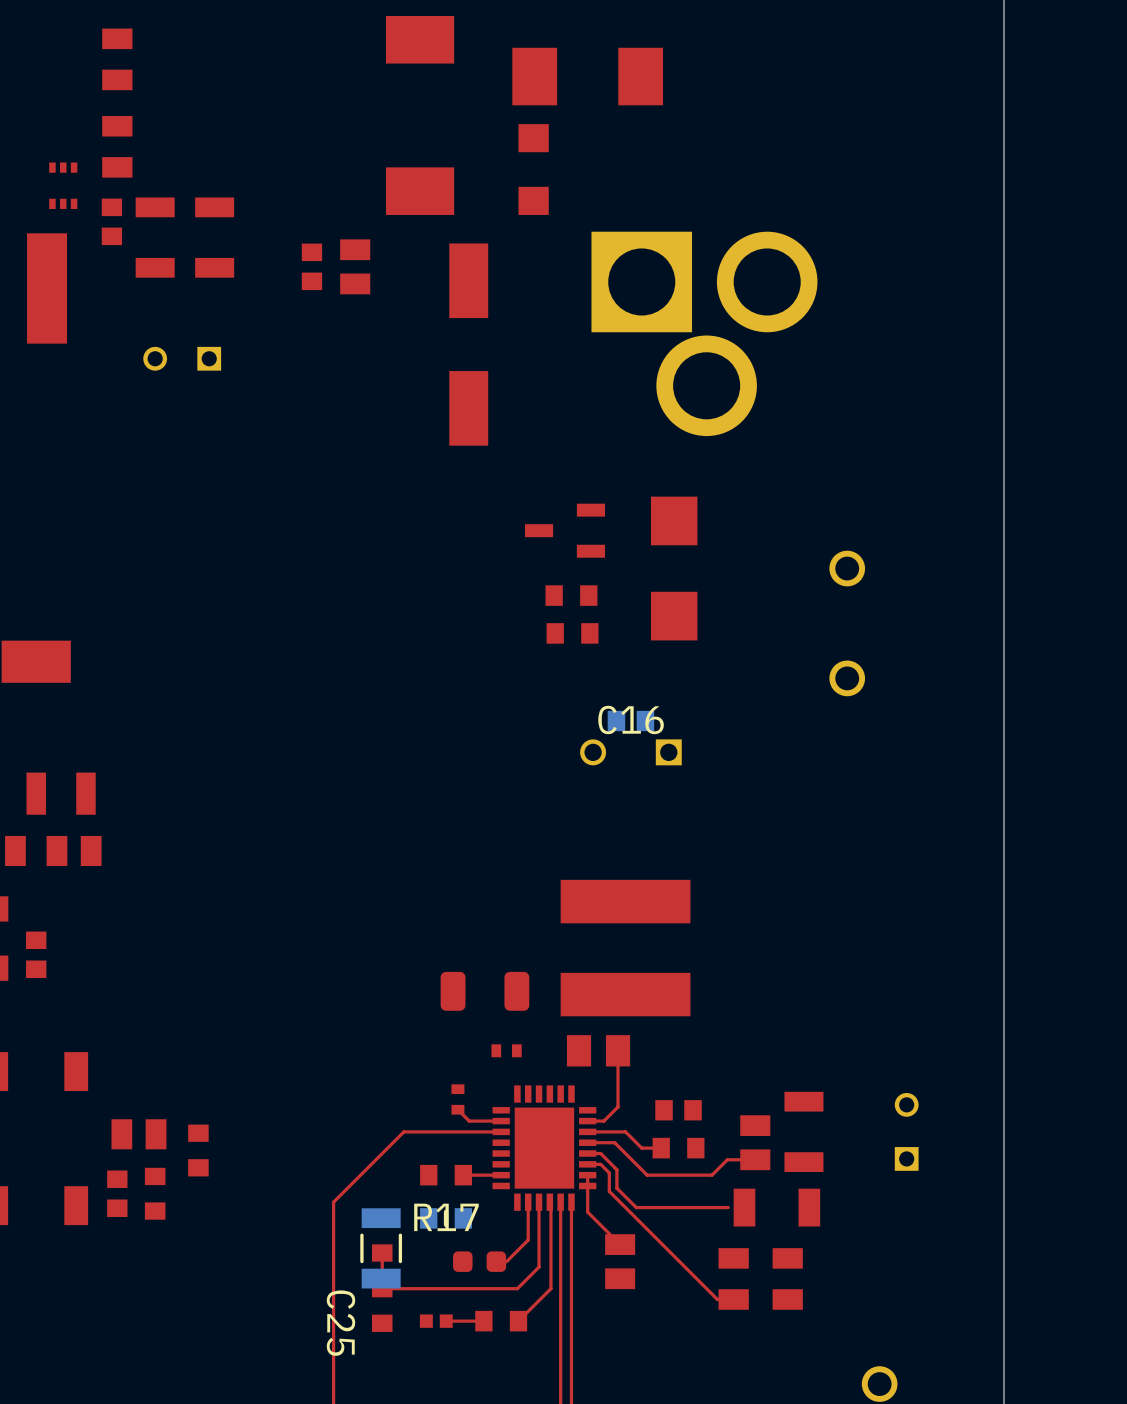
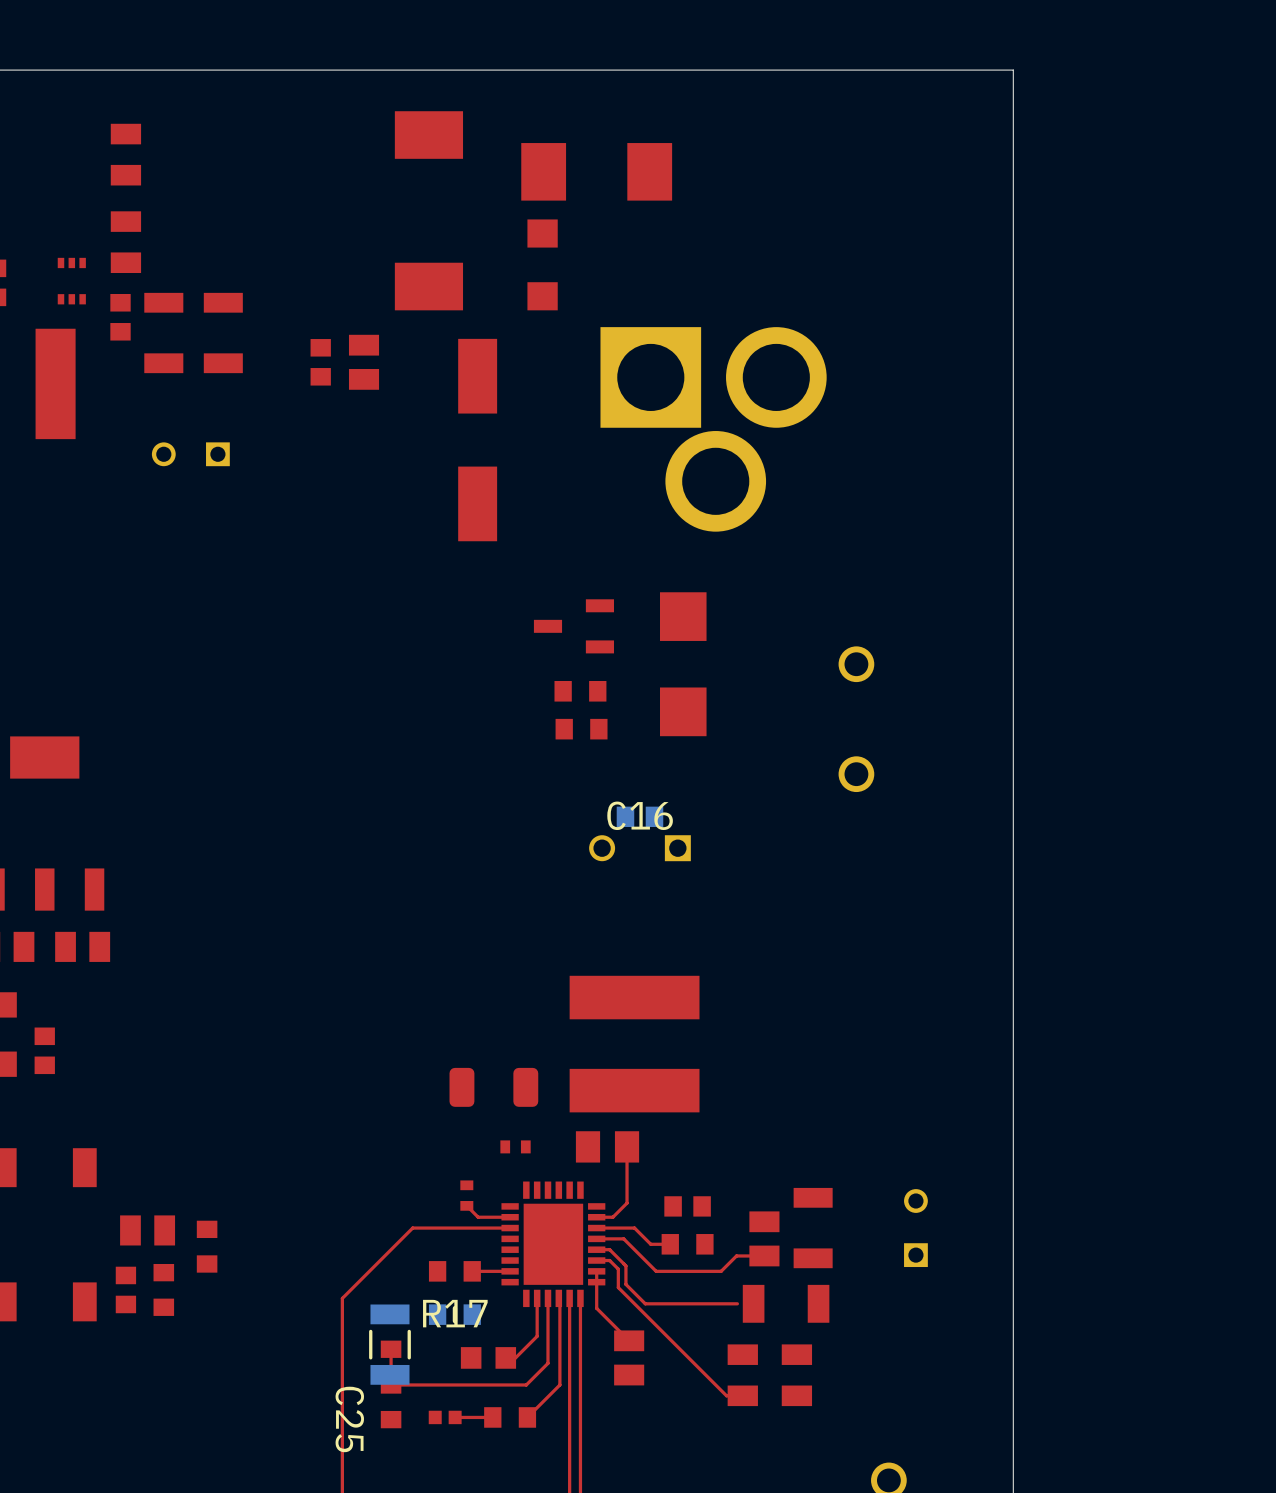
part footprint: [453, 1251, 507, 1272] -> [460, 1347, 517, 1369]

